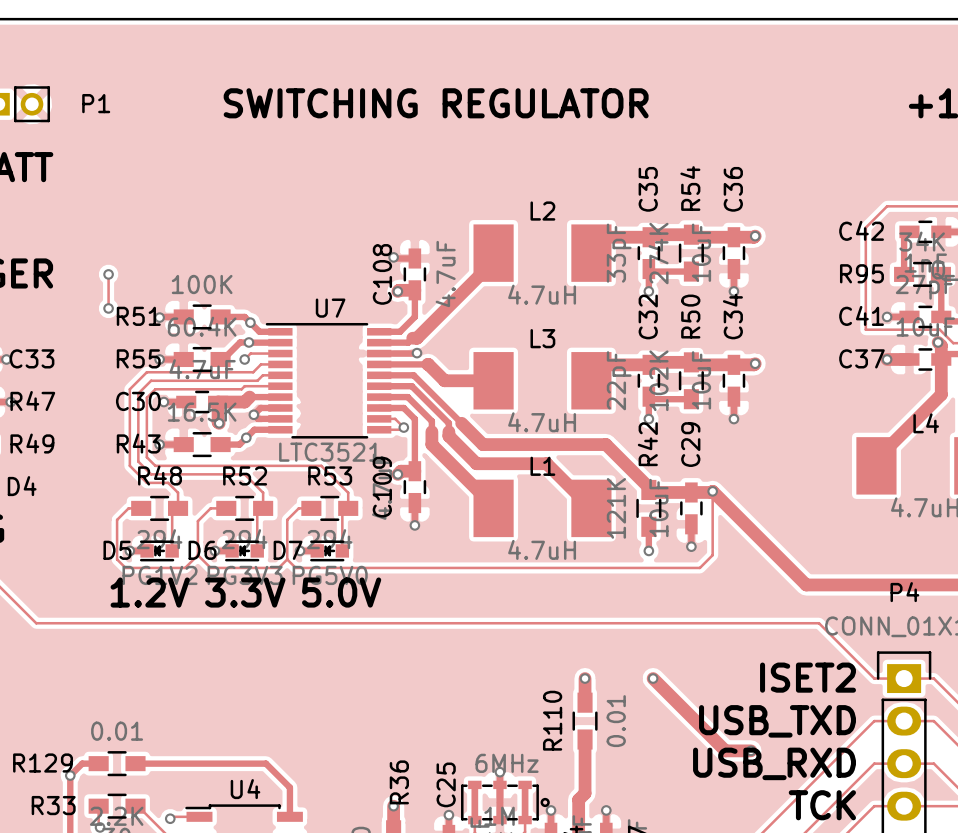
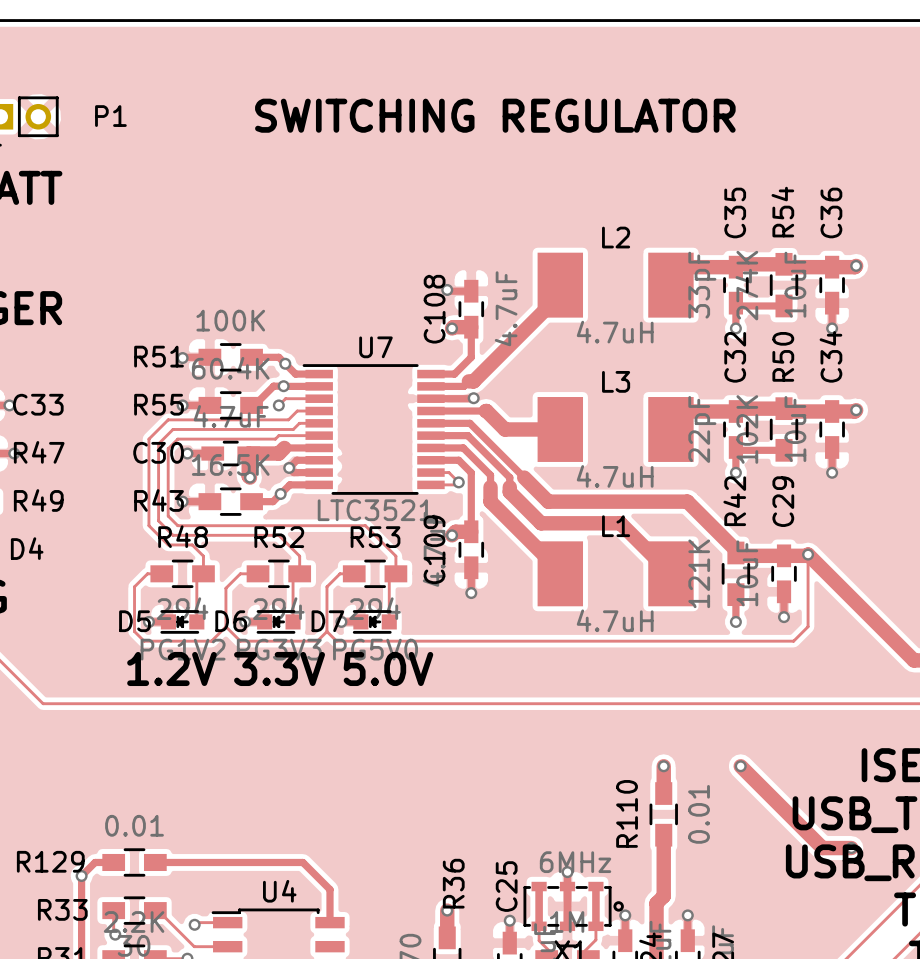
track: (108, 274) (108, 308) -> none
via: (108, 274) -> none
via: (108, 308) -> none

